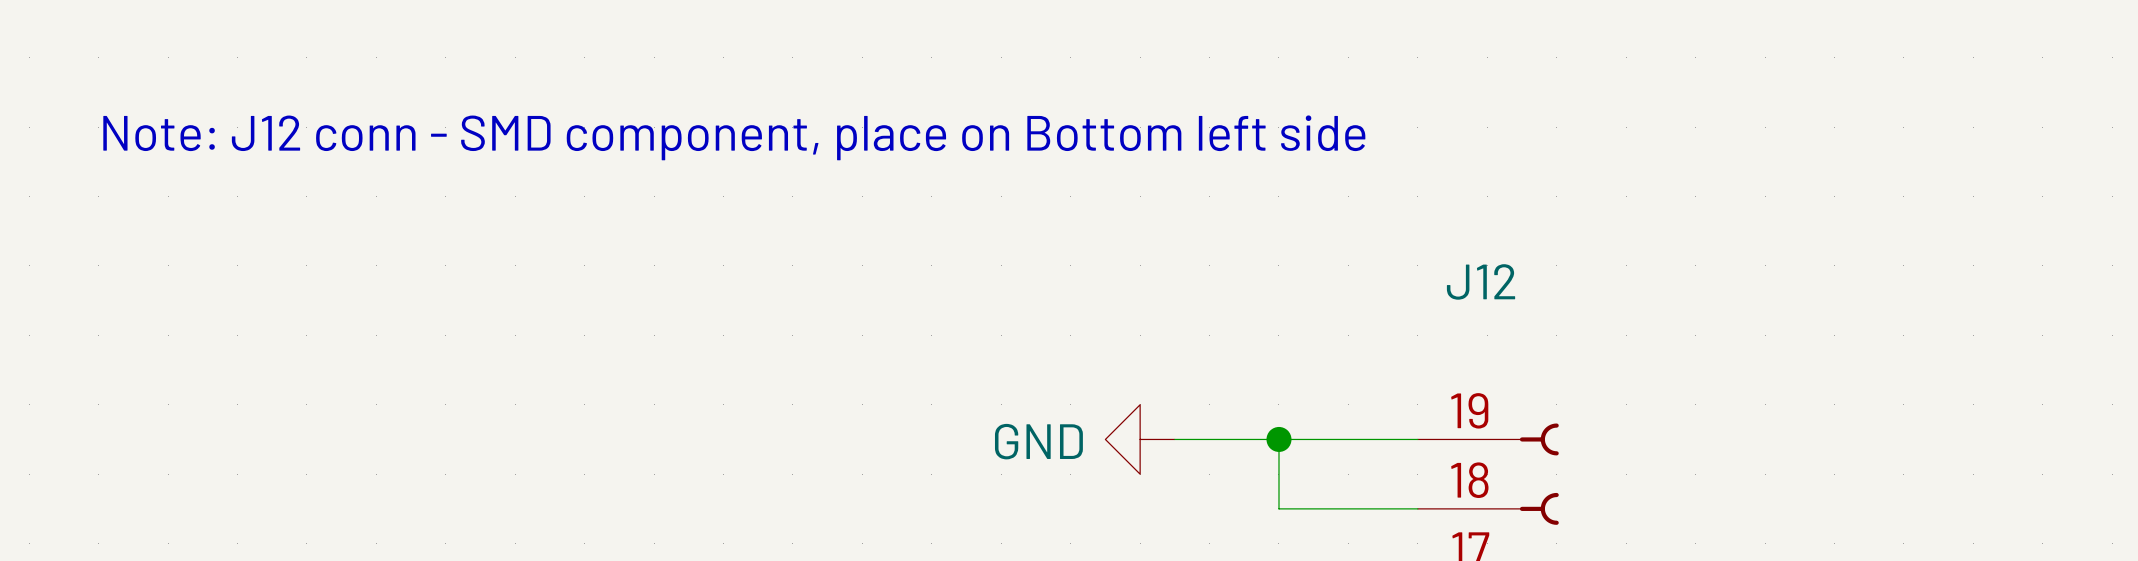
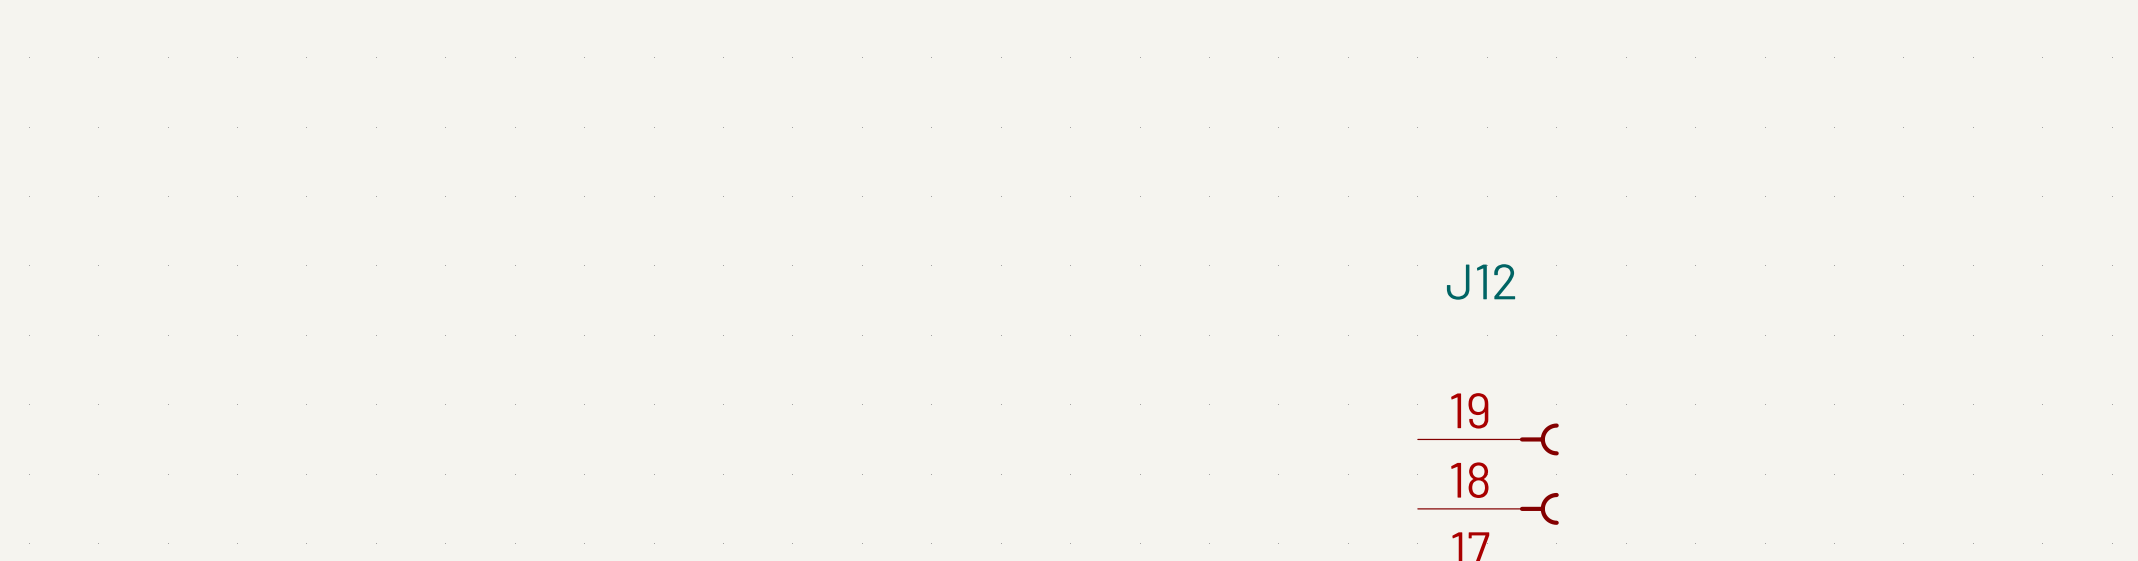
text: Note: J12 conn - SMD component, place on Bottom left side (734, 137) -> none
power symbol: GND (1140, 439) -> none
wire: (1174, 439) (1417, 439) -> none
wire: (1278, 439) (1278, 508) (1417, 508) -> none
junction: (1278, 439) -> none

